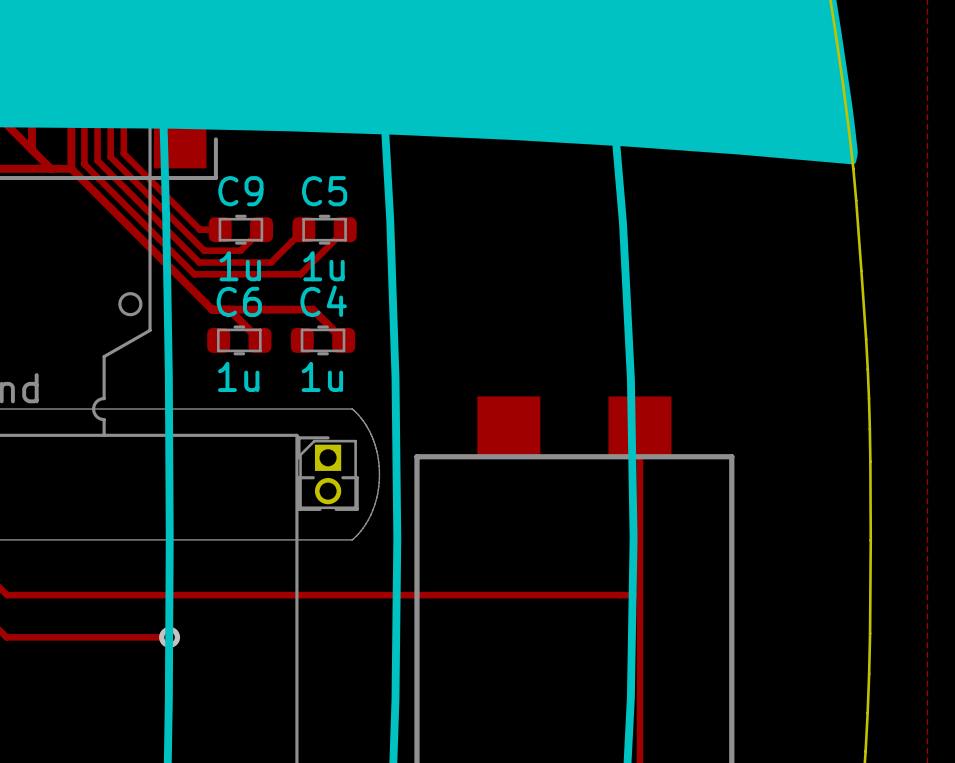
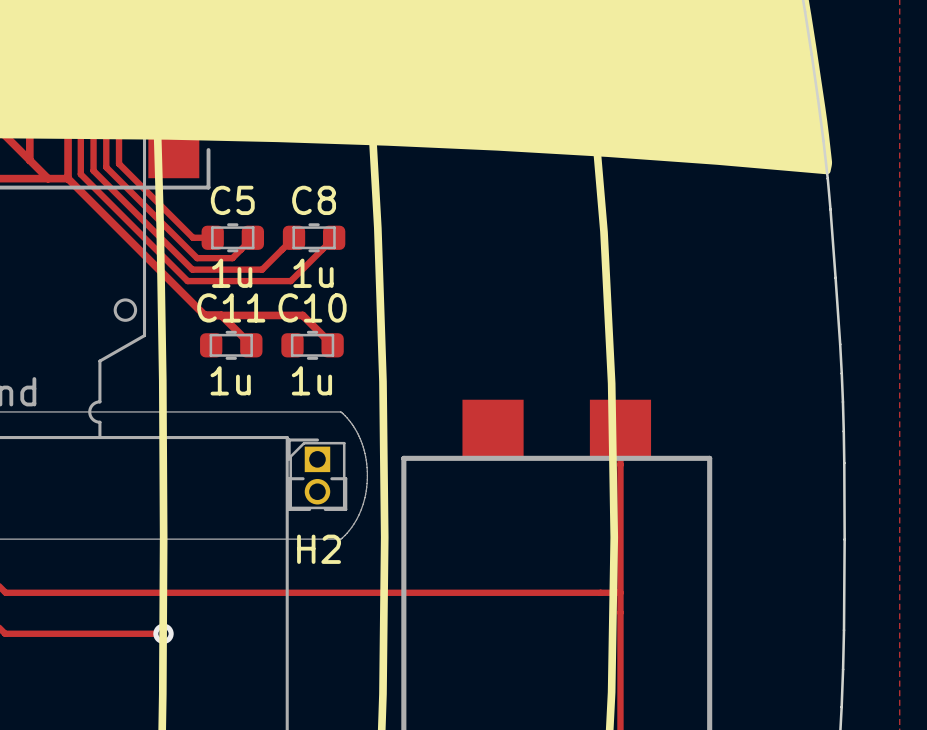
C9 name: C9 (240, 191) -> C5 (232, 200)
C5 name: C5 (324, 191) -> C8 (314, 200)
C6 name: C6 (239, 301) -> C11 (231, 307)
C4 name: C4 (323, 301) -> C10 (312, 307)
H2: none -> (319, 549)

